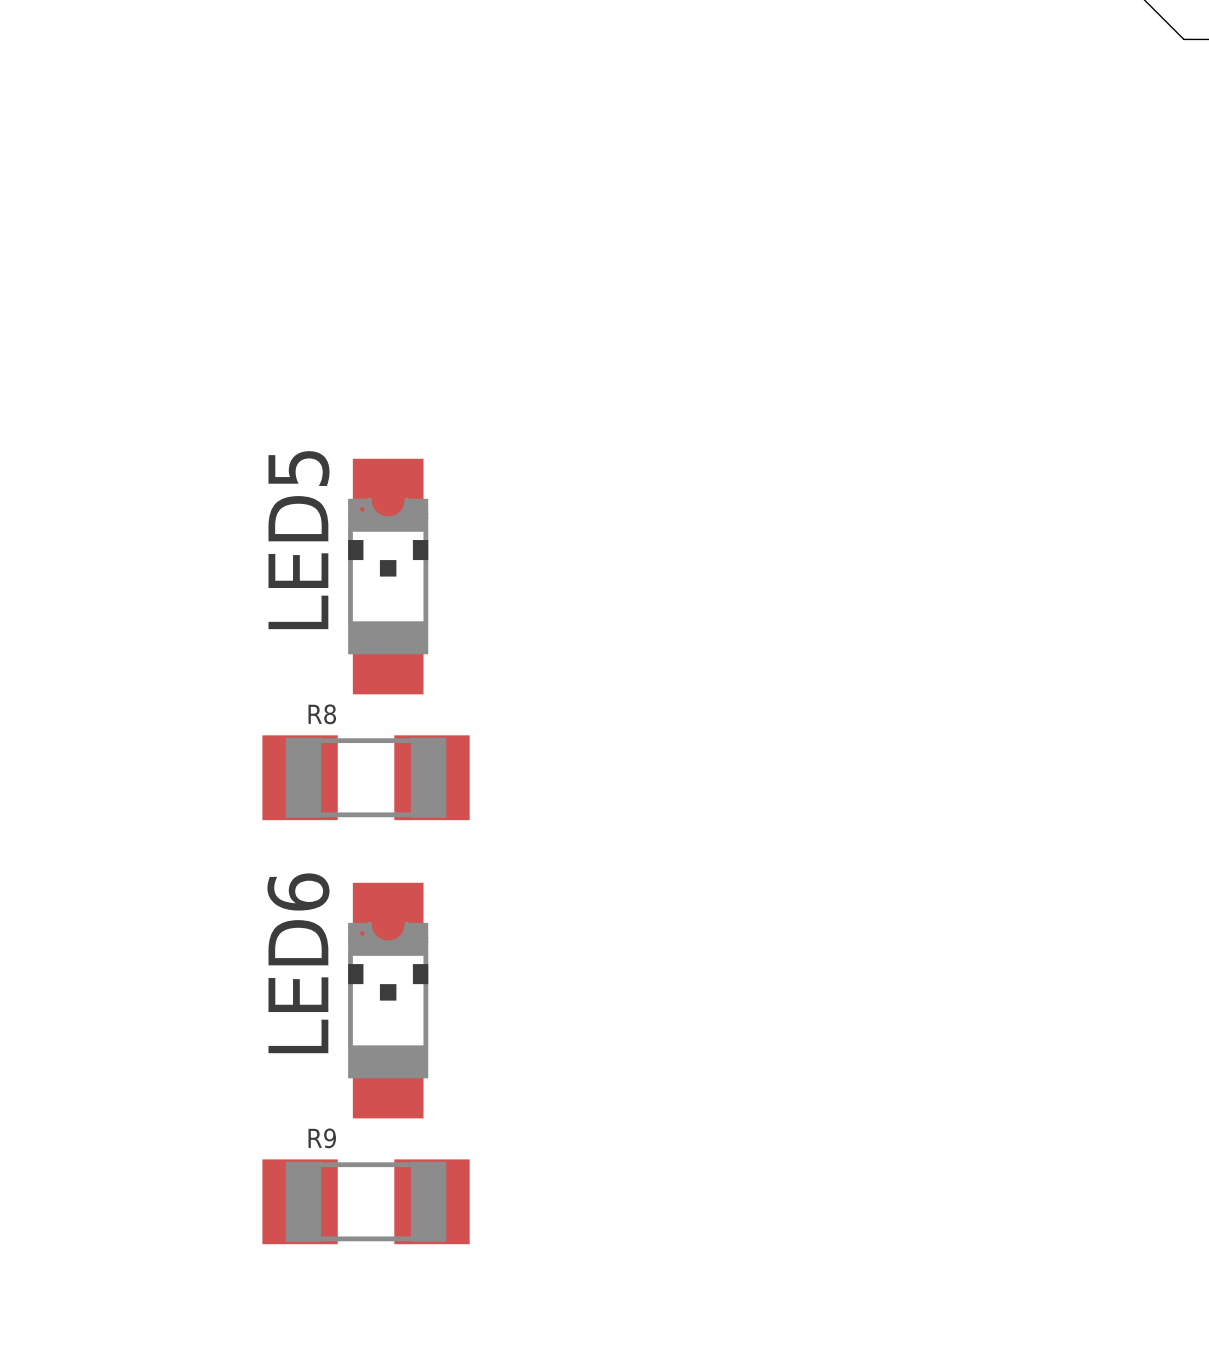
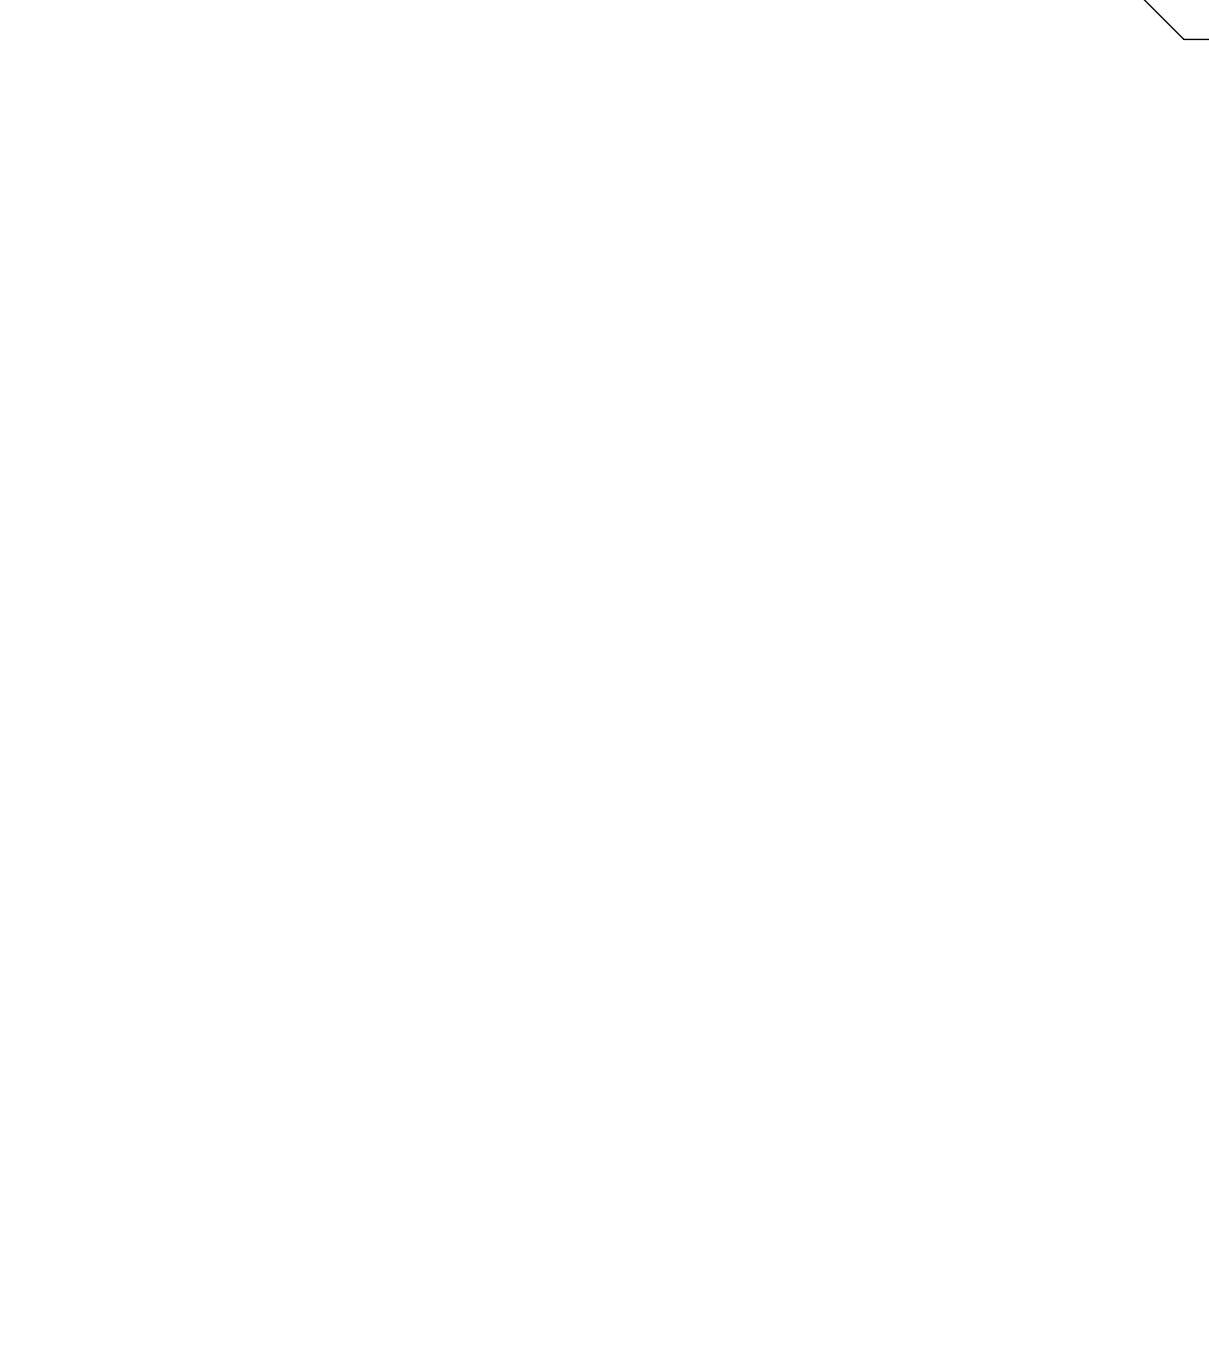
LED5: (388, 576) -> none
R8: (366, 777) -> none
LED6: (388, 1000) -> none
R9: (366, 1201) -> none

